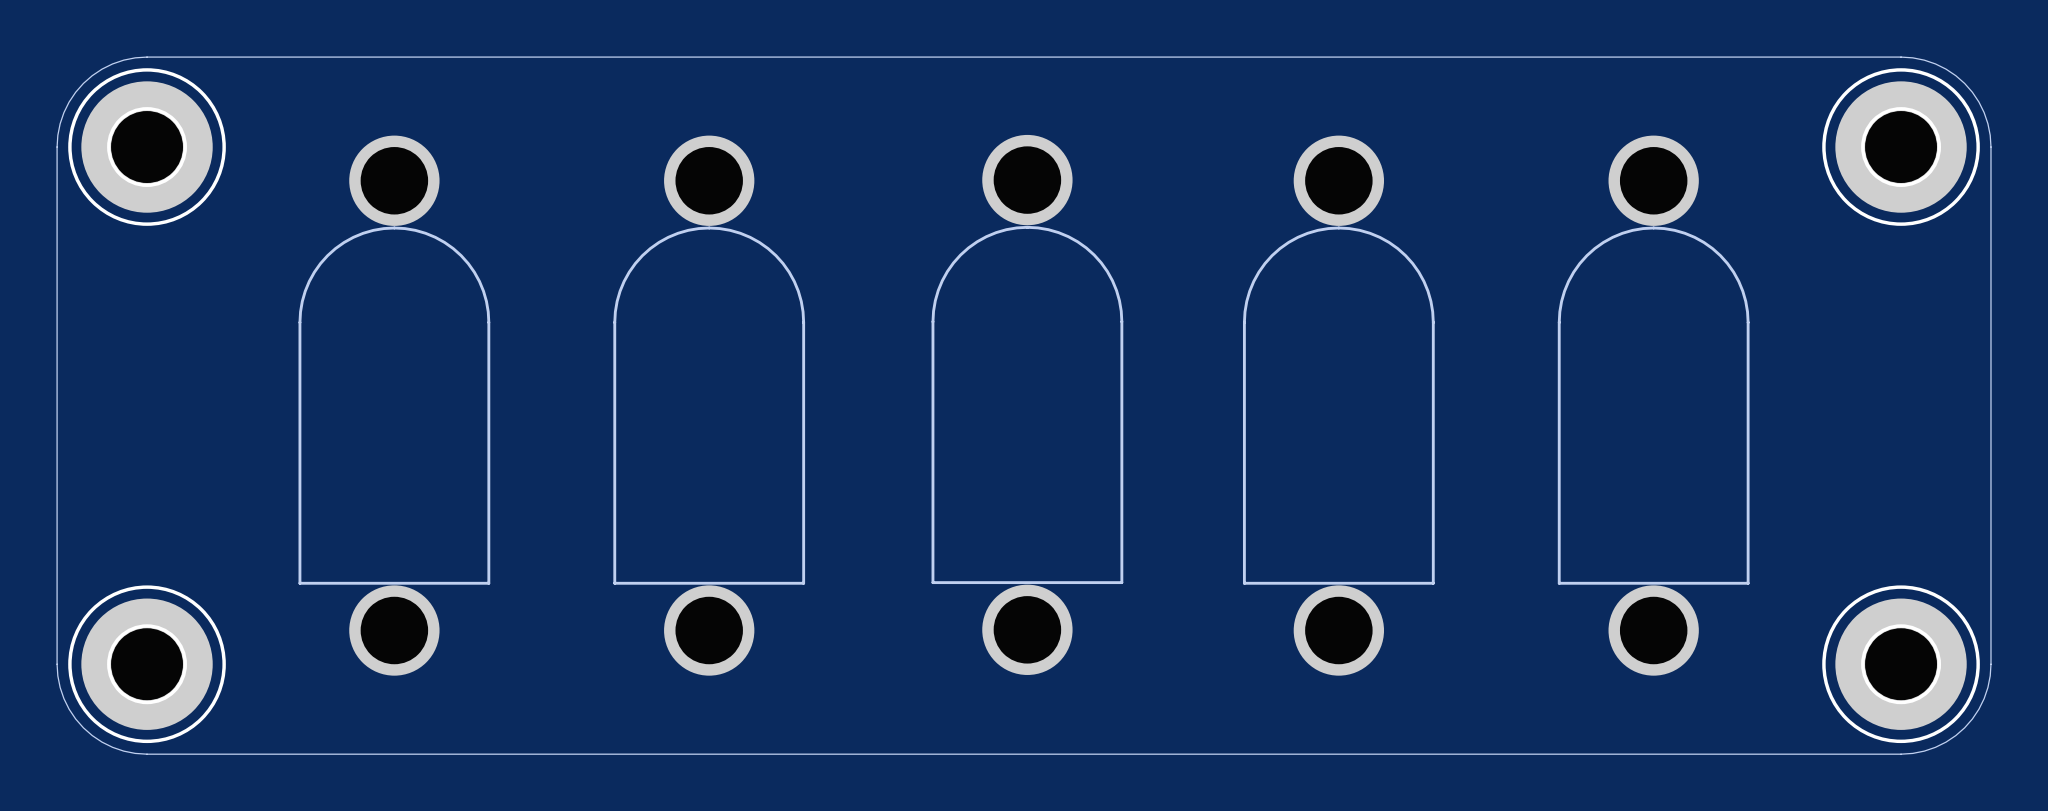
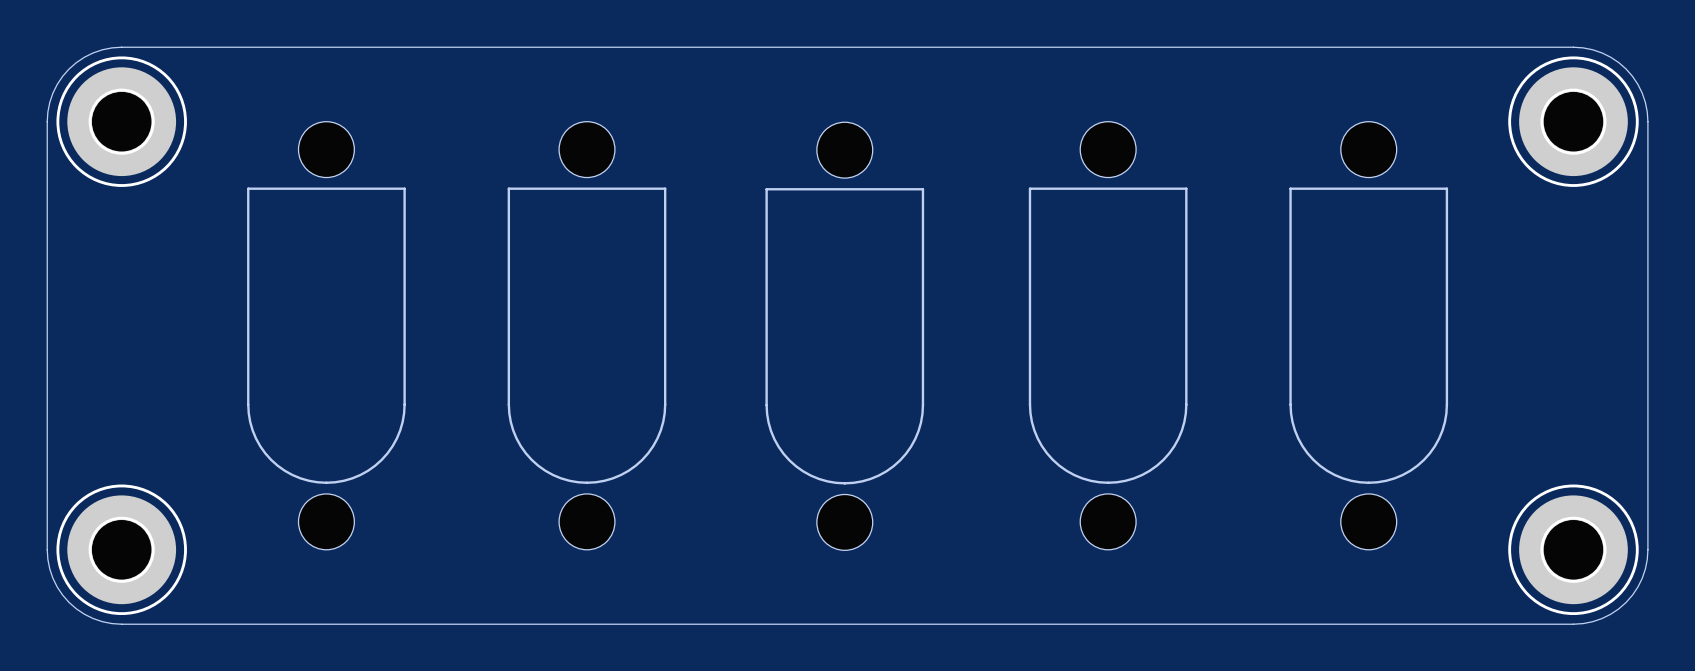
part footprint: [931, 134, 1124, 675] -> [765, 122, 925, 551]
part footprint: [298, 135, 491, 676] -> [247, 121, 406, 550]
part footprint: [613, 135, 806, 676] -> [507, 121, 667, 550]
part footprint: [1242, 135, 1435, 676] -> [1028, 121, 1188, 550]
part footprint: [1557, 135, 1750, 676] -> [1289, 121, 1449, 550]

